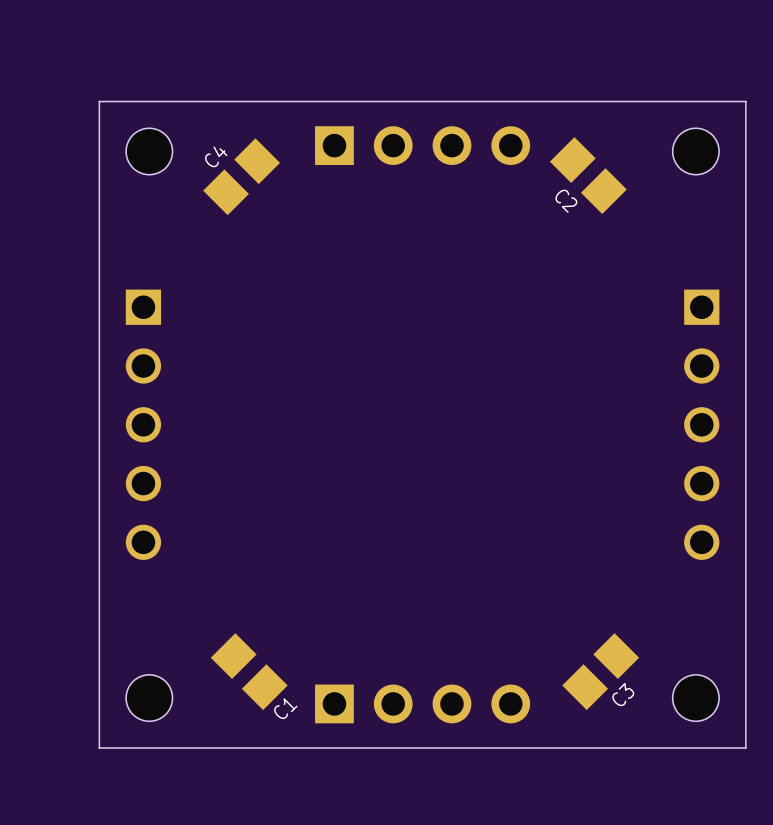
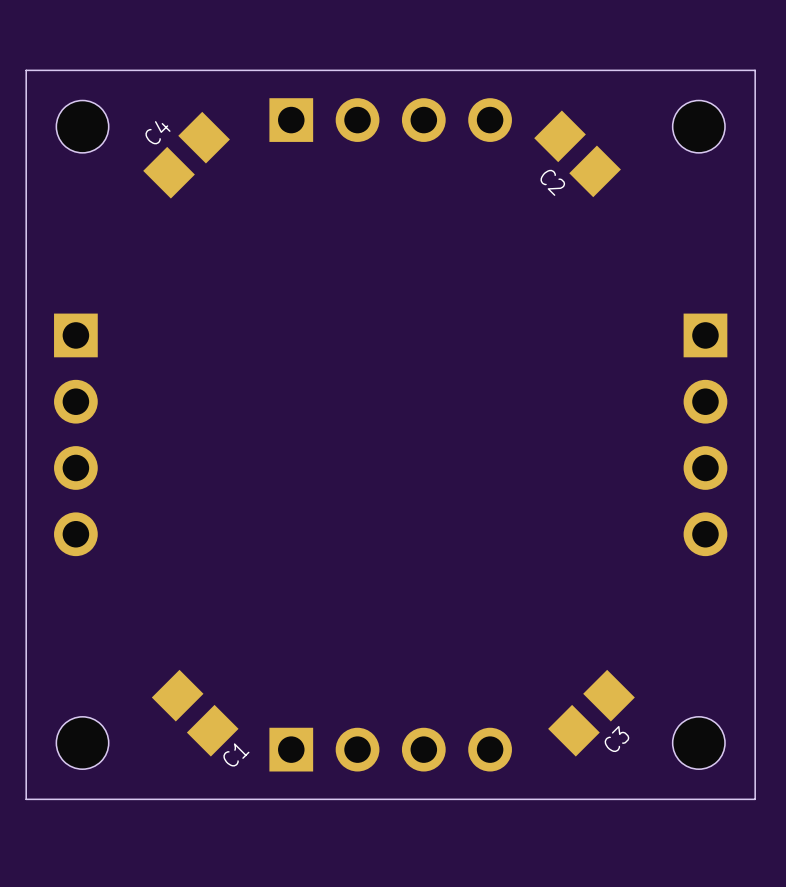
part footprint: [125, 289, 162, 560] -> [54, 313, 98, 557]
part footprint: [684, 289, 720, 560] -> [683, 313, 728, 557]

